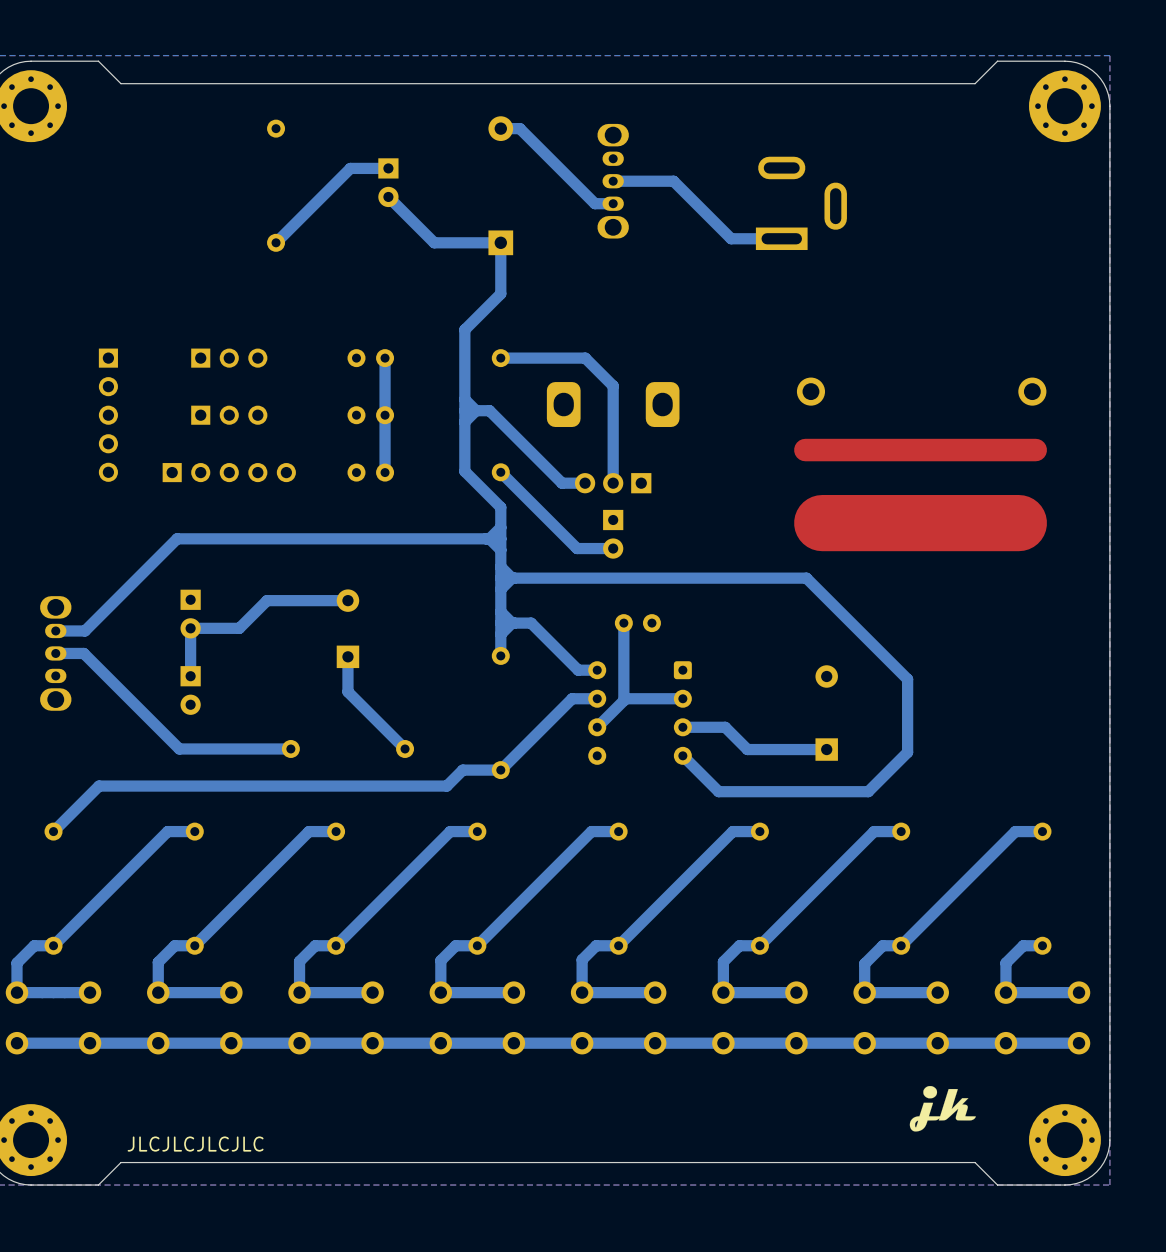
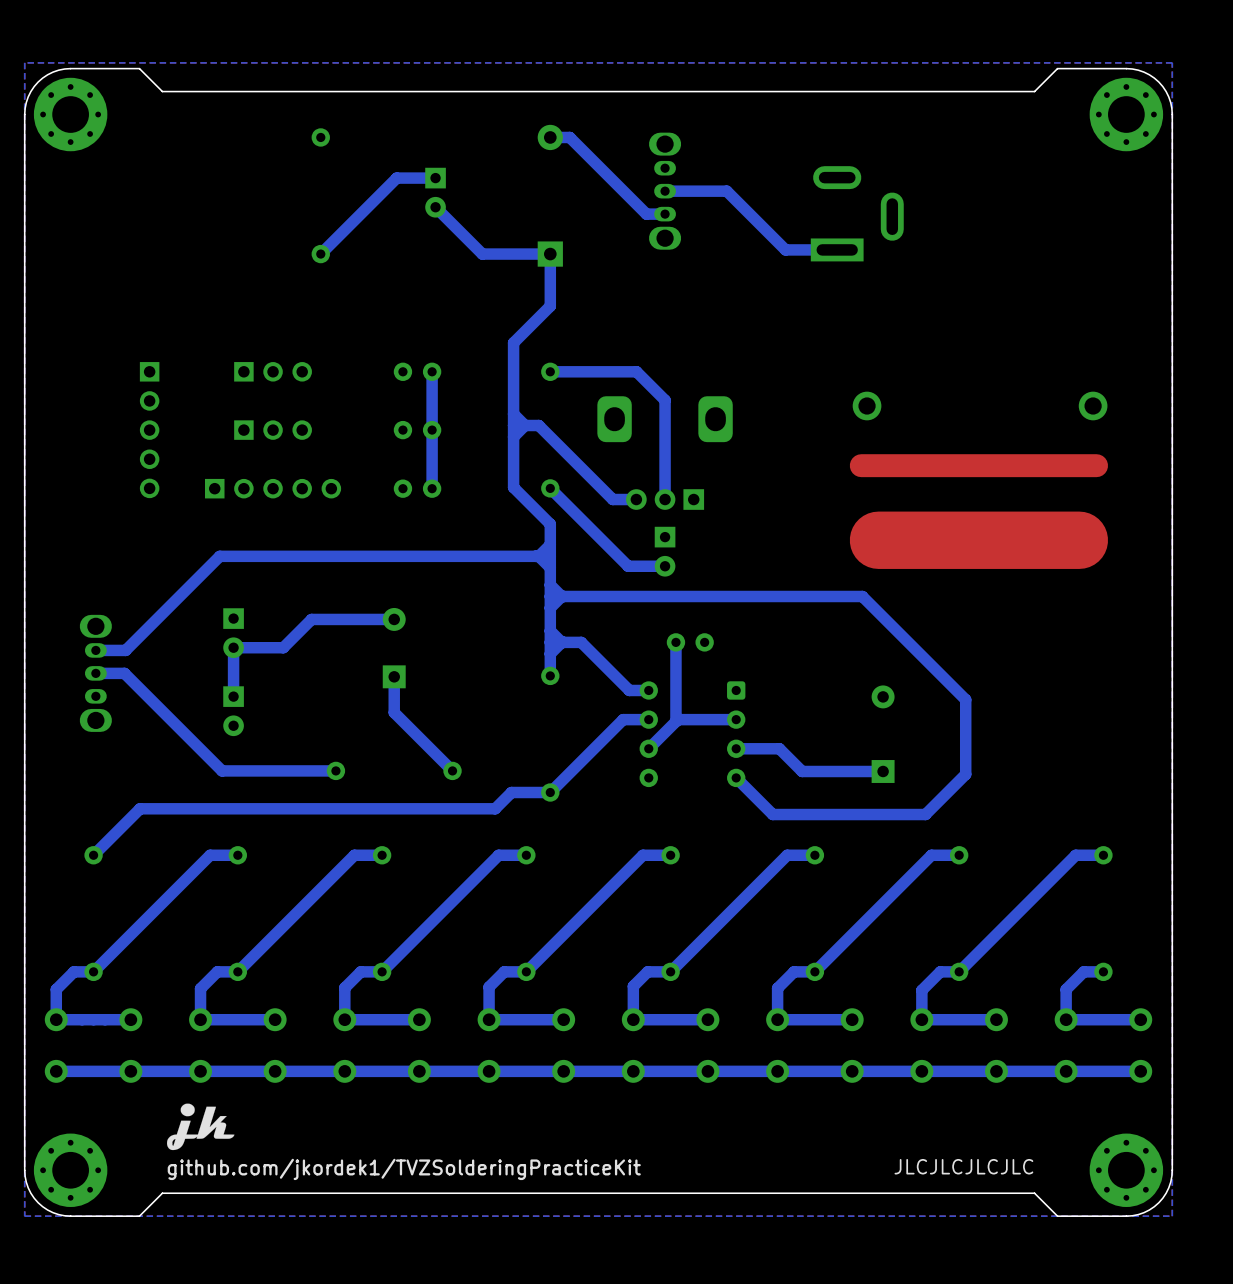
drawing: none -> [166, 1103, 235, 1151]
drawing: [909, 1086, 976, 1132] -> none
text: none -> JLCJLCJLCJLC (963, 1166)
text: JLCJLCJLCJLC (195, 1144) -> github.com/jkordek1/TVZSolderingPracticeKit (404, 1169)

